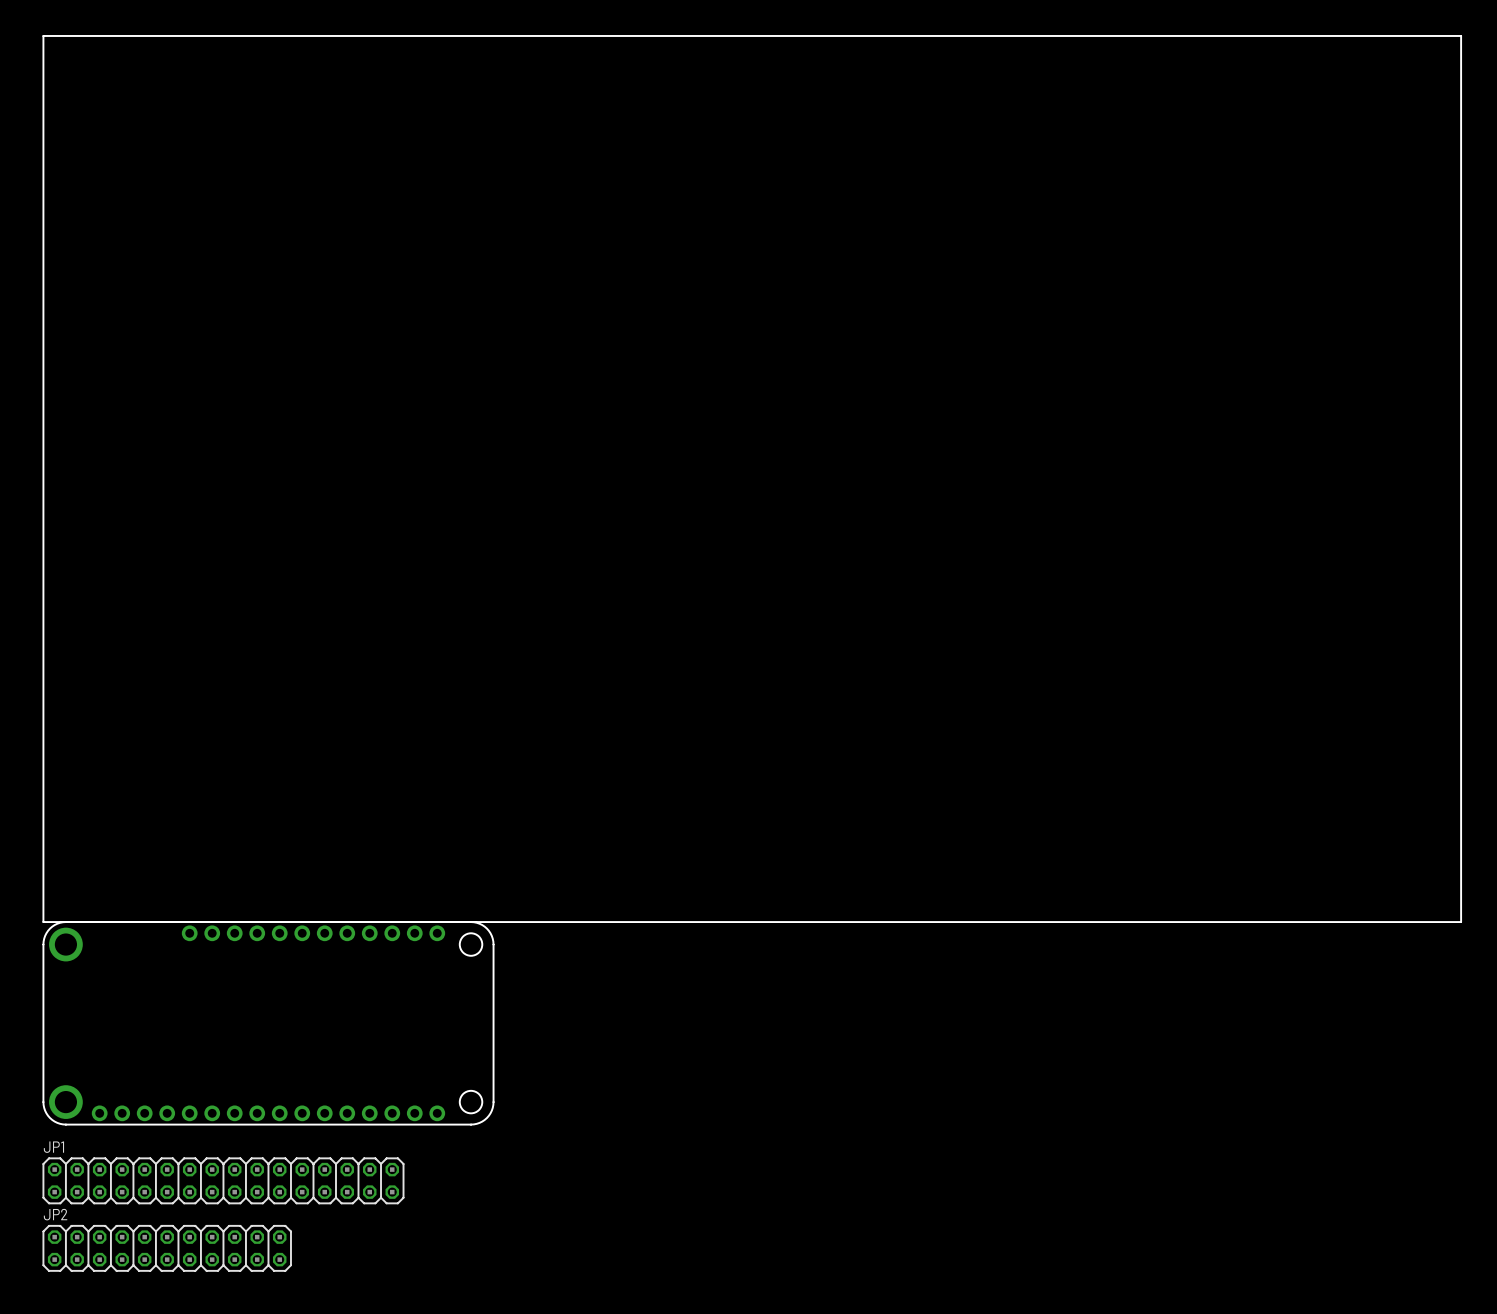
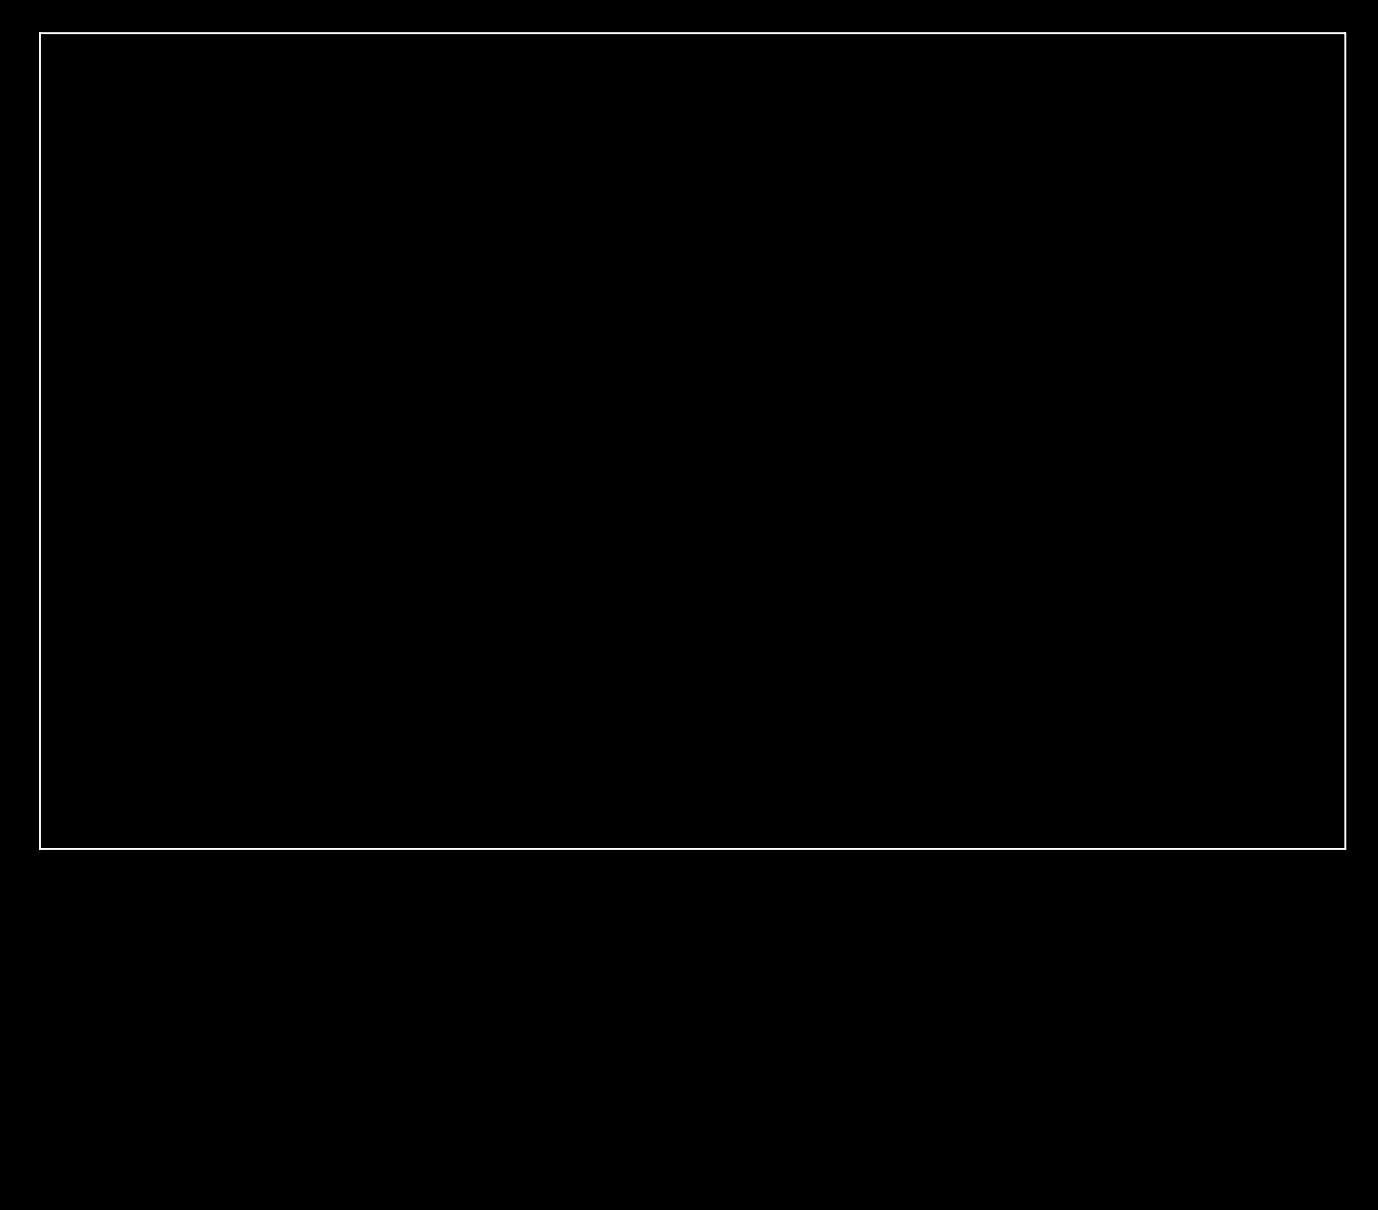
part: (268, 1023) -> none
JP1: (223, 1180) -> none
JP2: (167, 1248) -> none

